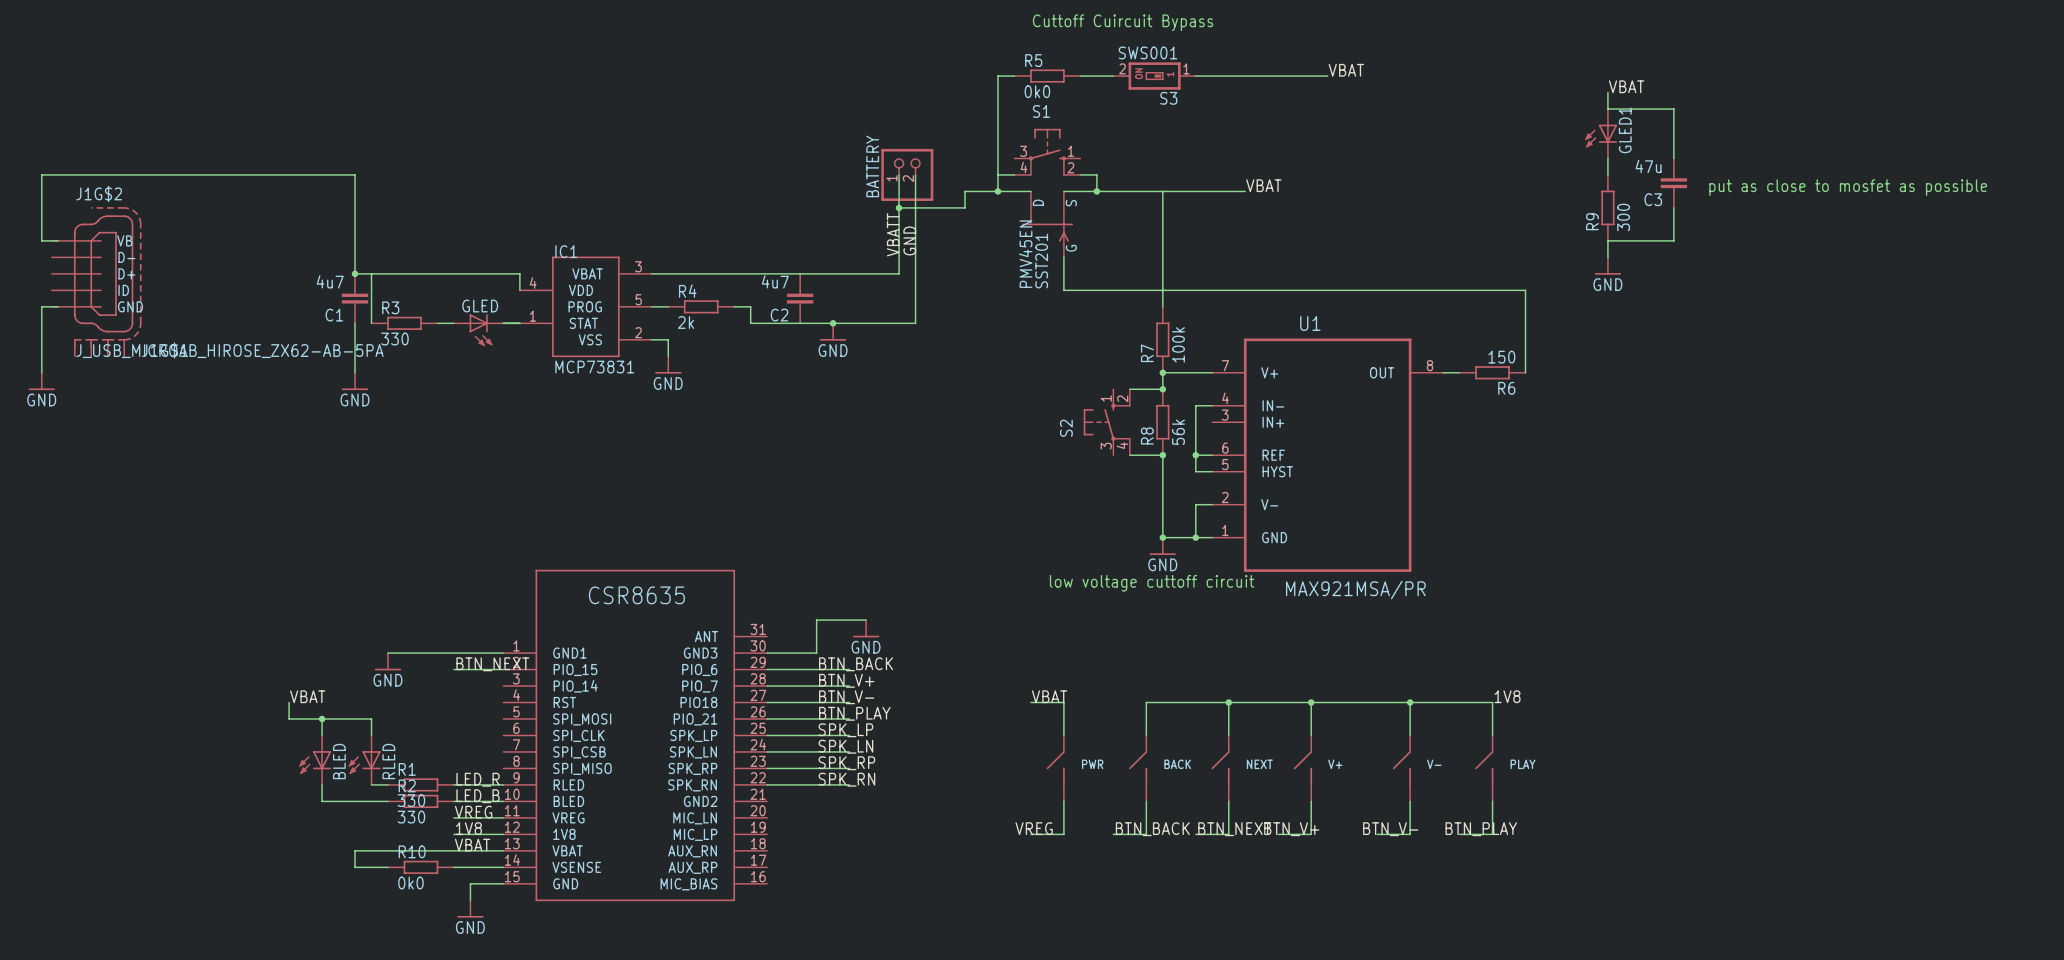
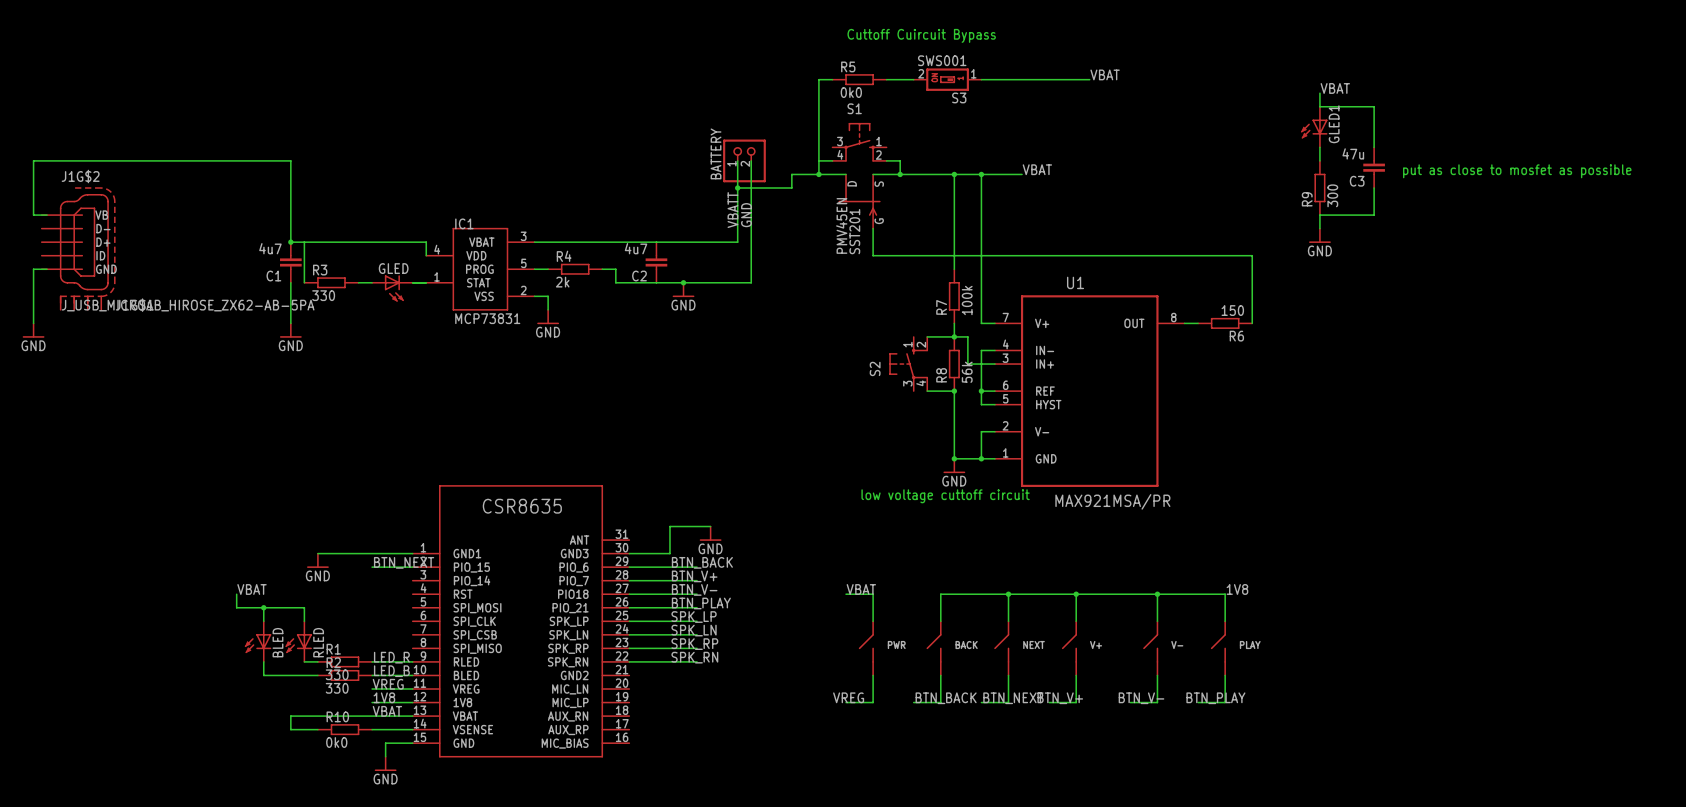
junction: none -> (954, 174)
junction: none -> (981, 174)
wire: (1162, 372) (1195, 372) -> (981, 174) (981, 323)
junction: (1162, 372) -> none
wire: none -> (954, 336) (967, 336) (967, 364) (994, 364)

